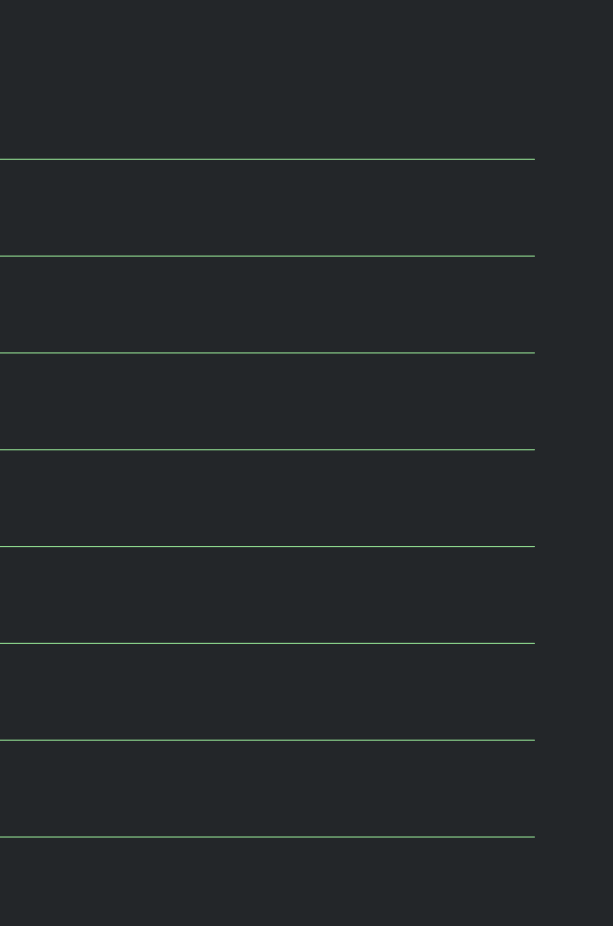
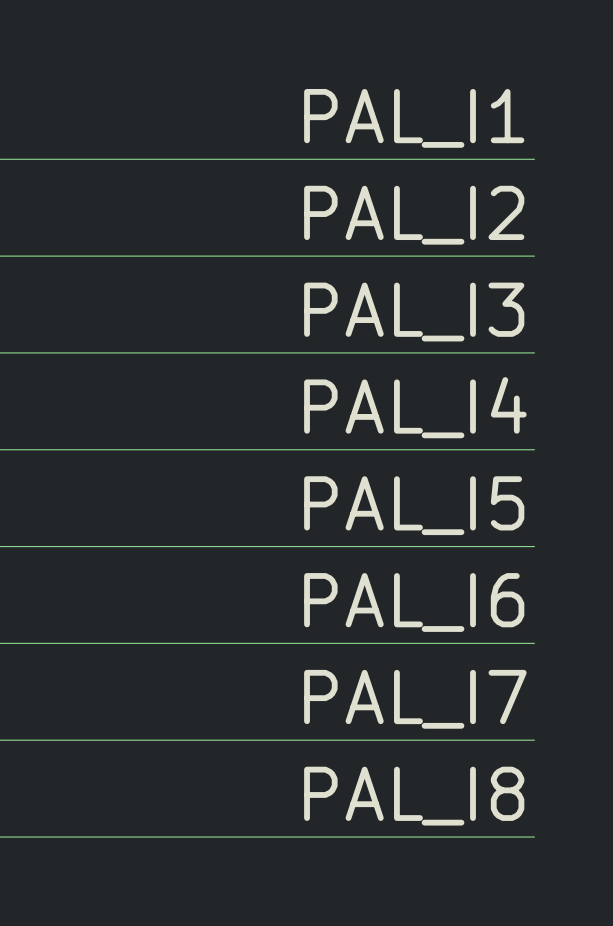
label: none -> PAL_I1 (414, 118)
label: none -> PAL_I2 (414, 215)
label: none -> PAL_I3 (414, 312)
label: none -> PAL_I4 (415, 407)
label: none -> PAL_I5 (414, 505)
label: none -> PAL_I6 (414, 602)
label: none -> PAL_I7 (415, 699)
label: none -> PAL_I8 (414, 796)

